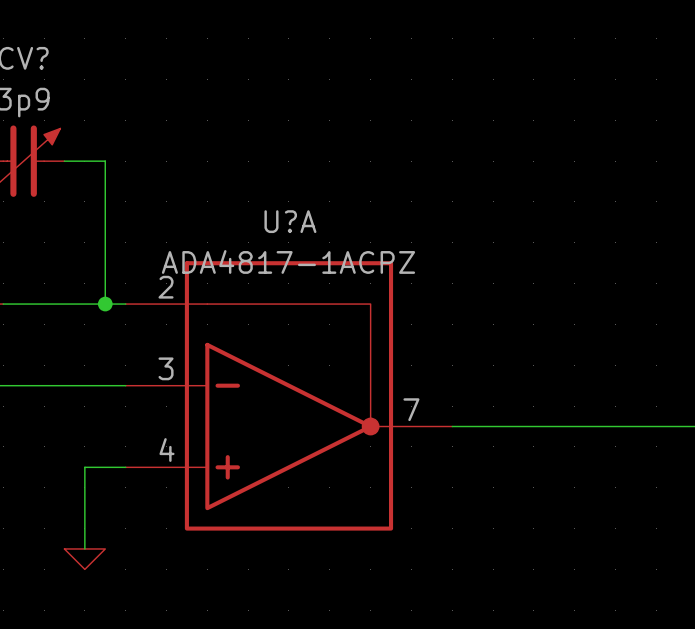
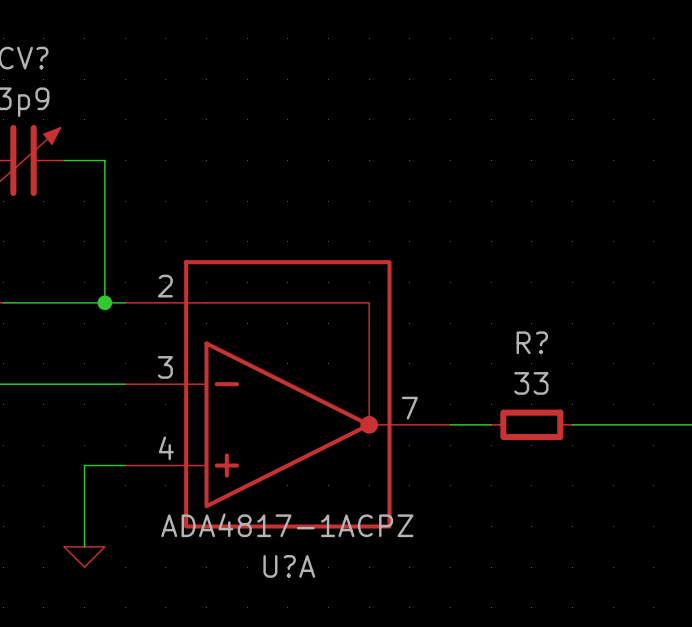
U?A name position: U?A (290, 221) -> U?A (289, 566)
U?A value position: ADA4817-1ACPZ (288, 261) -> ADA4817-1ACPZ (287, 525)
wire: (493, 426) (574, 426) -> none
R?: none -> 33 (531, 424)

